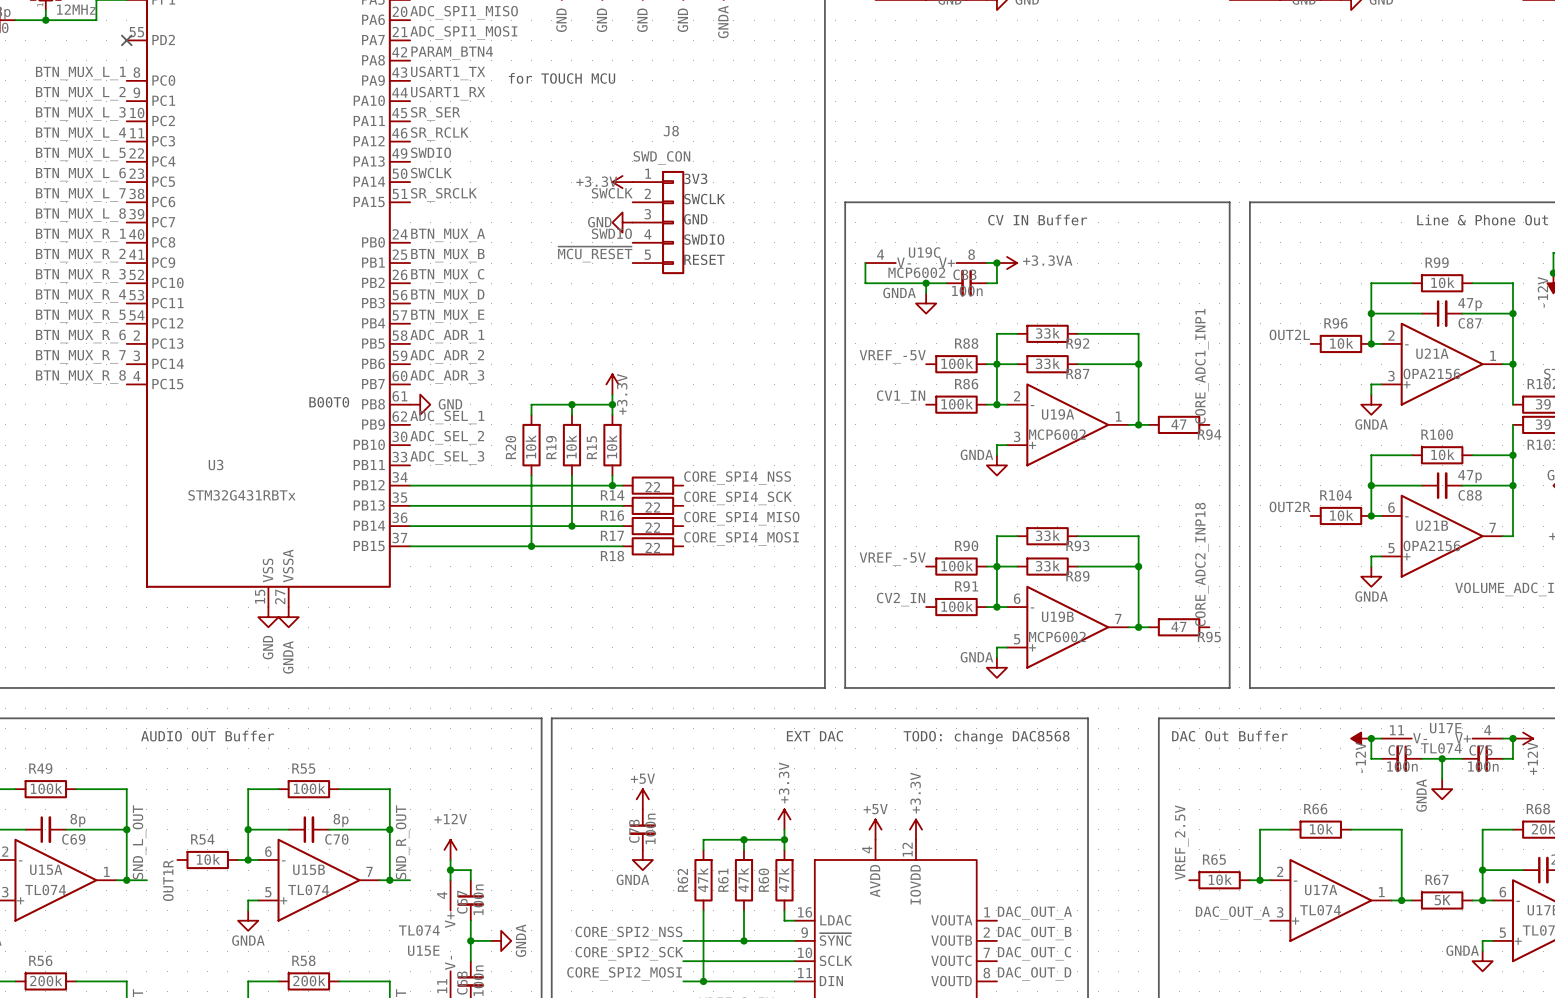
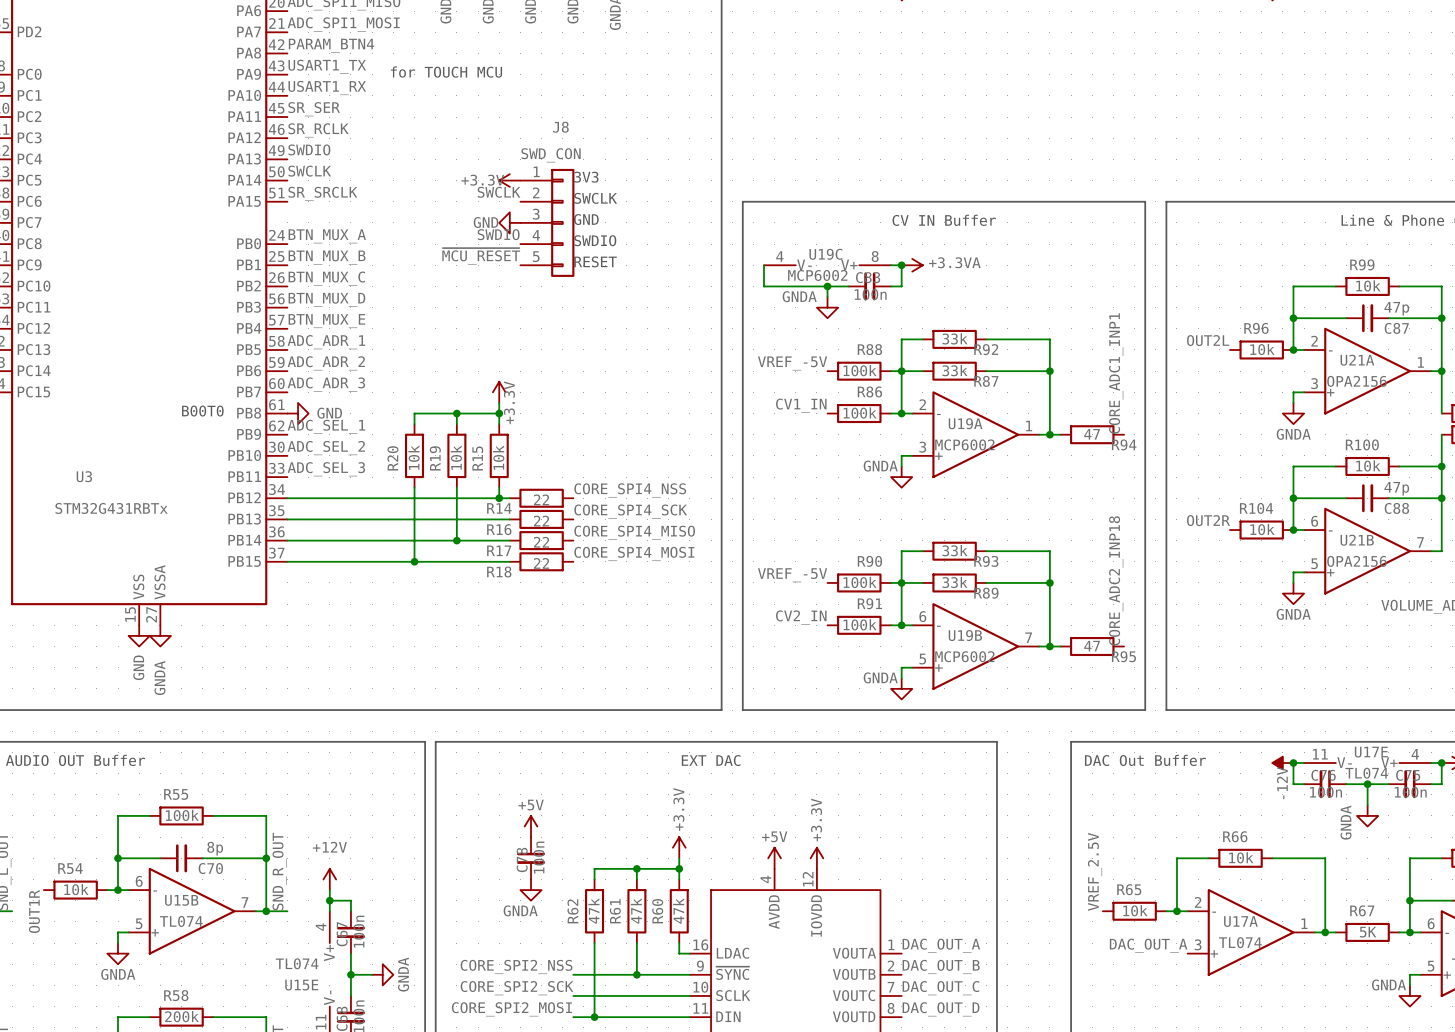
text: TODO: change DAC8568 (986, 737) -> none

